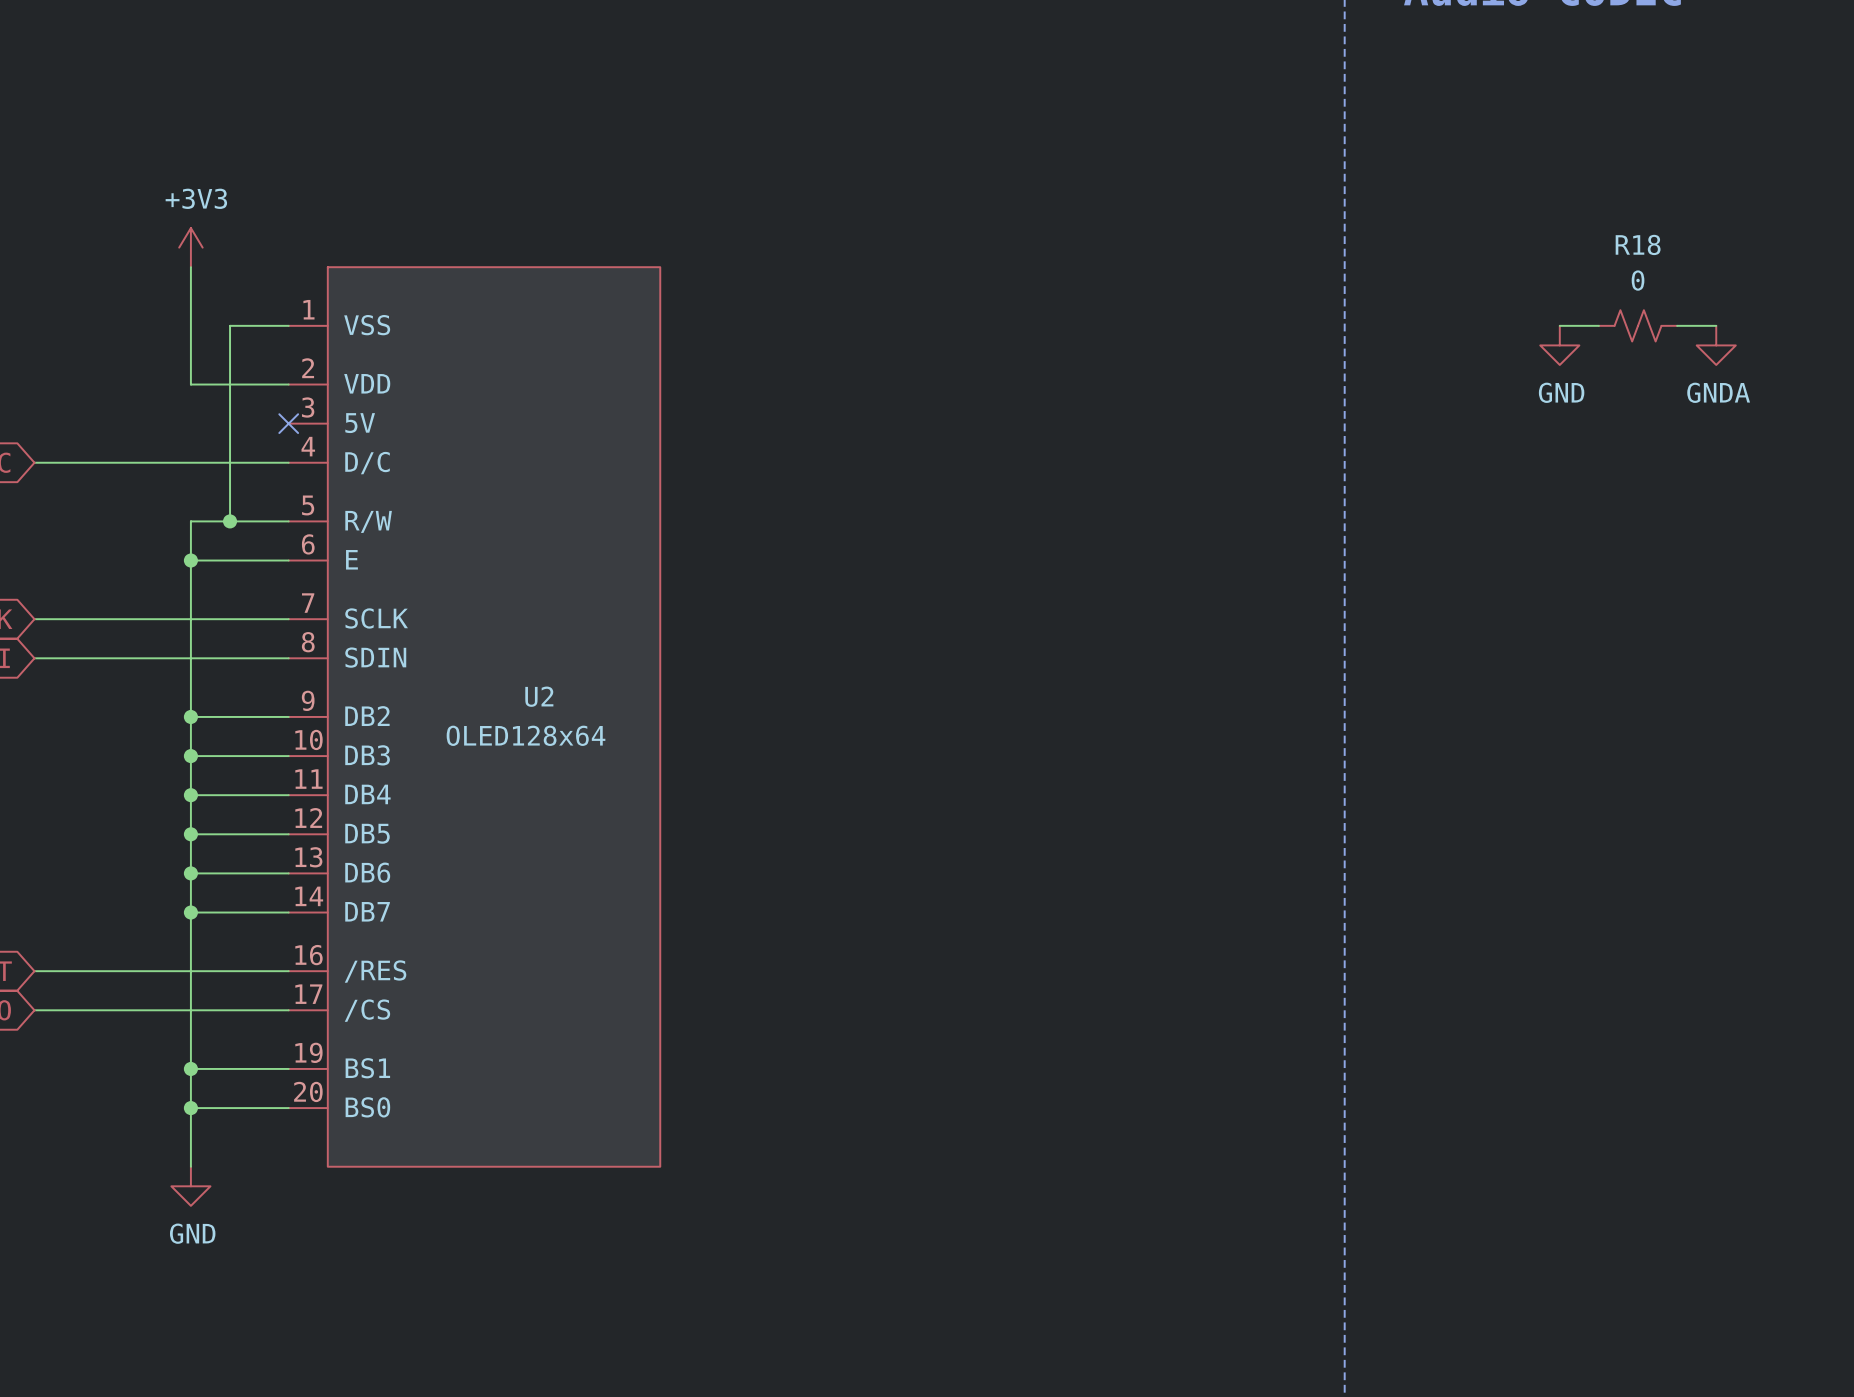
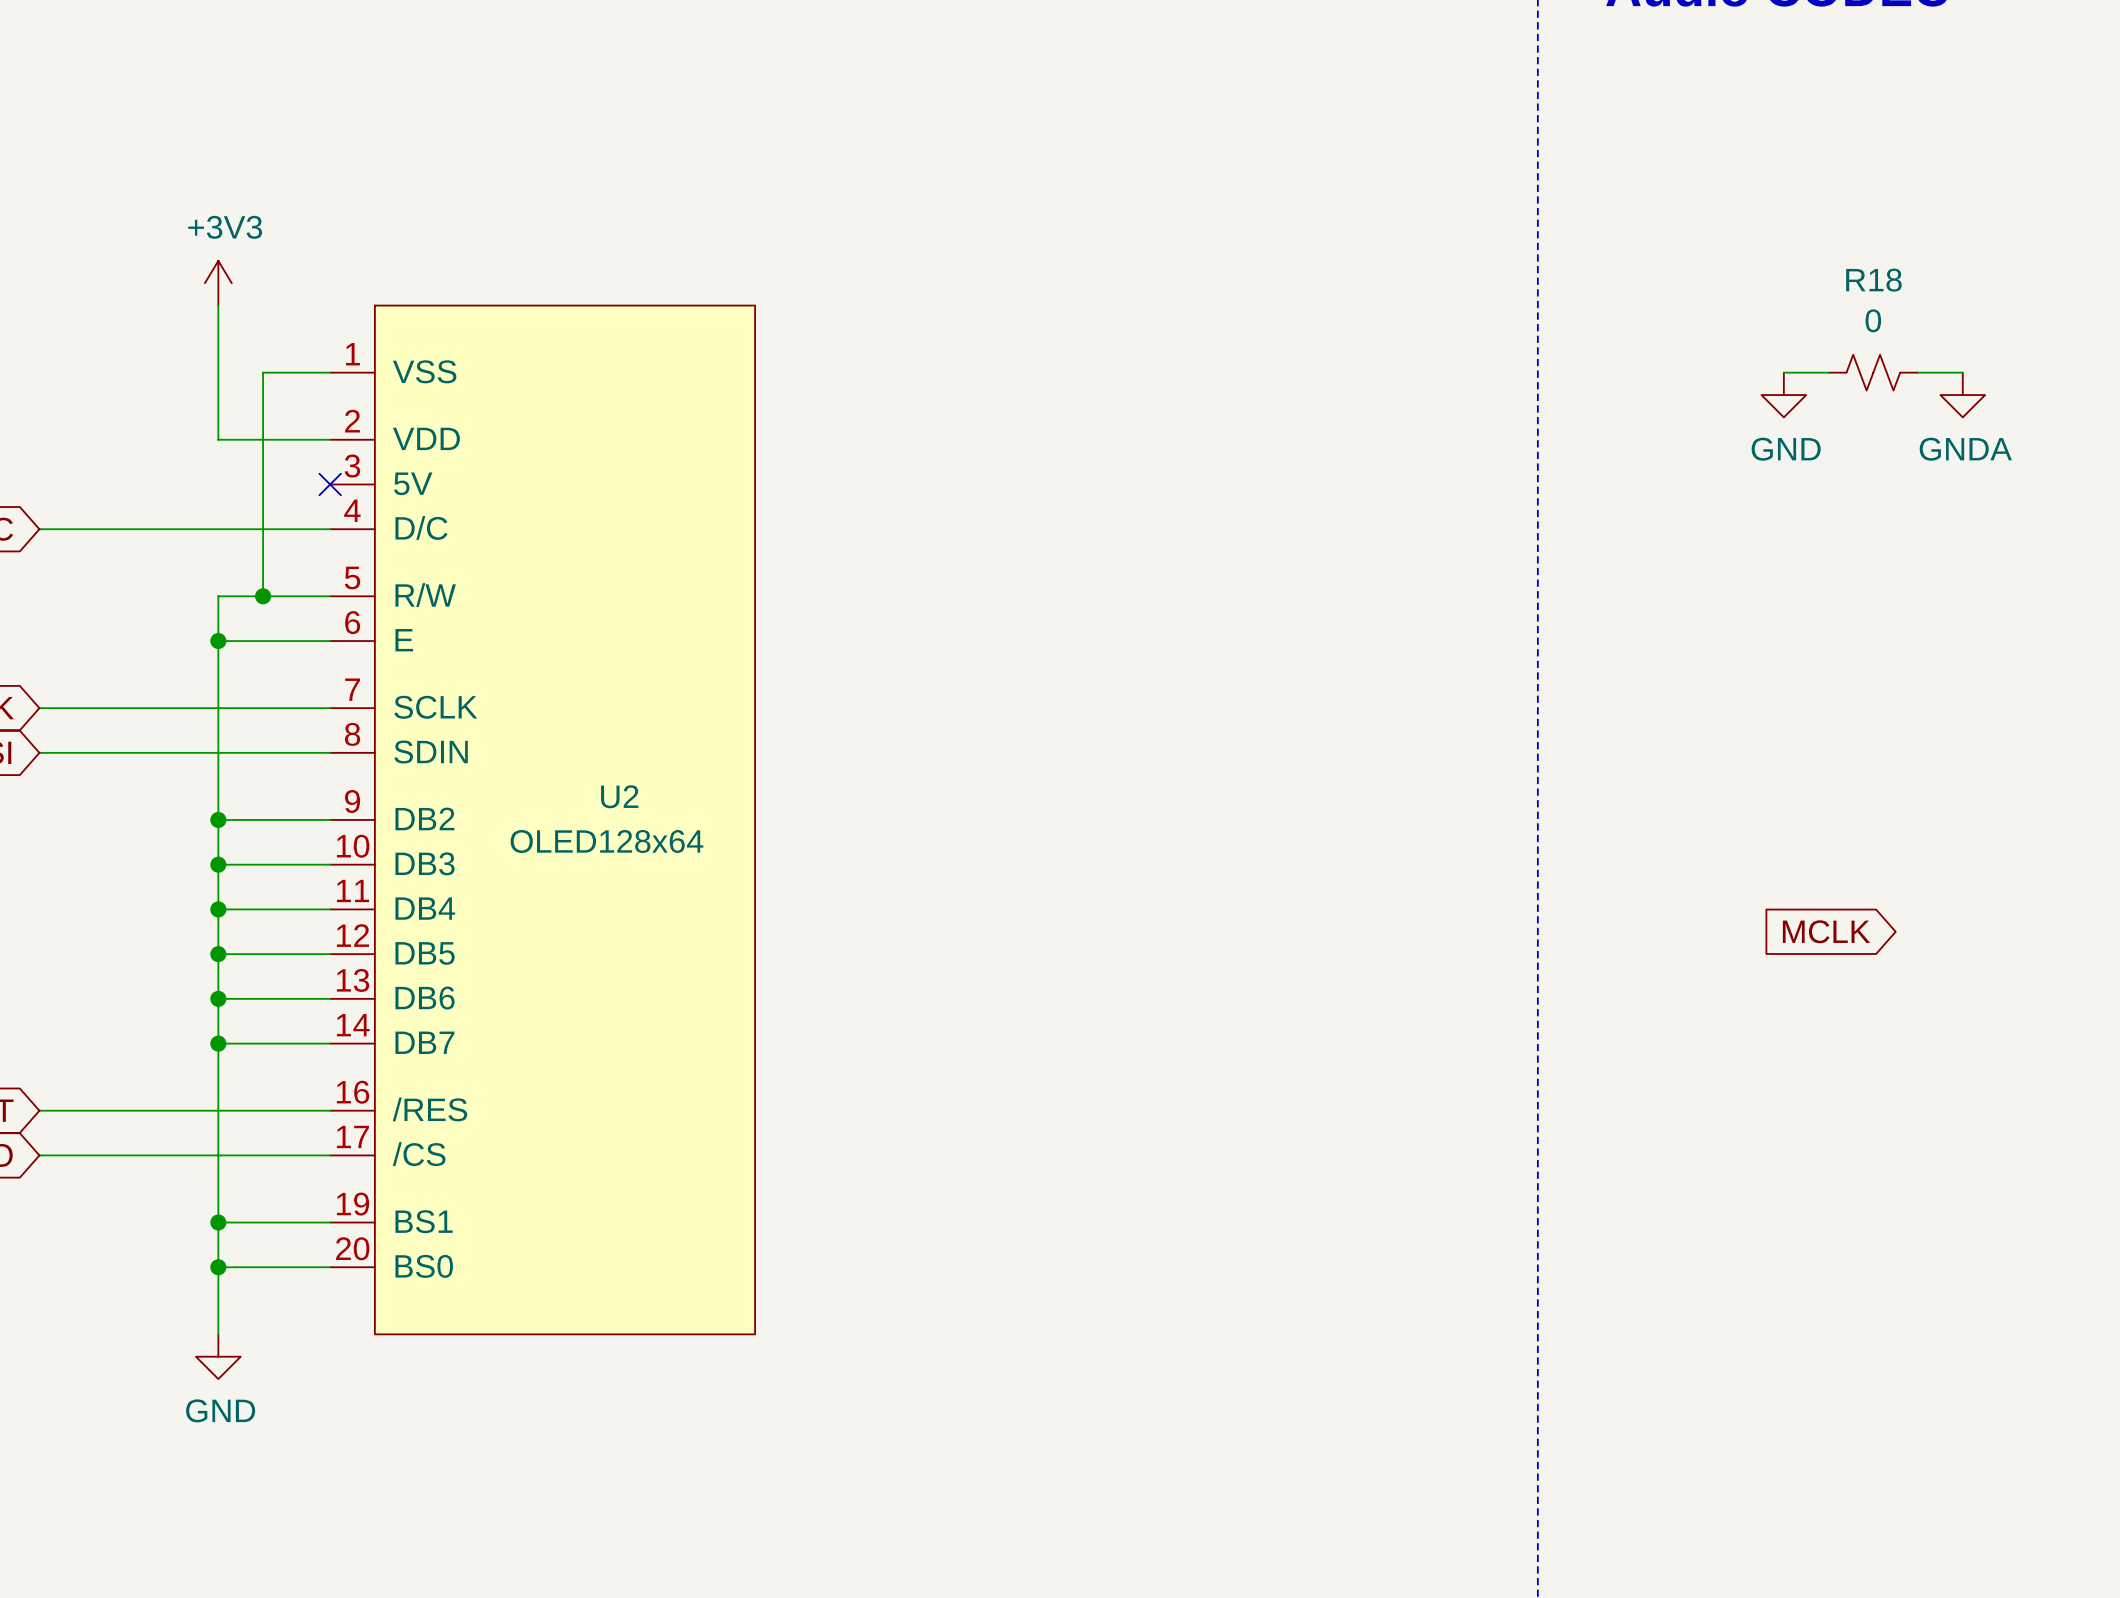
global label: none -> MCLK (1826, 931)

